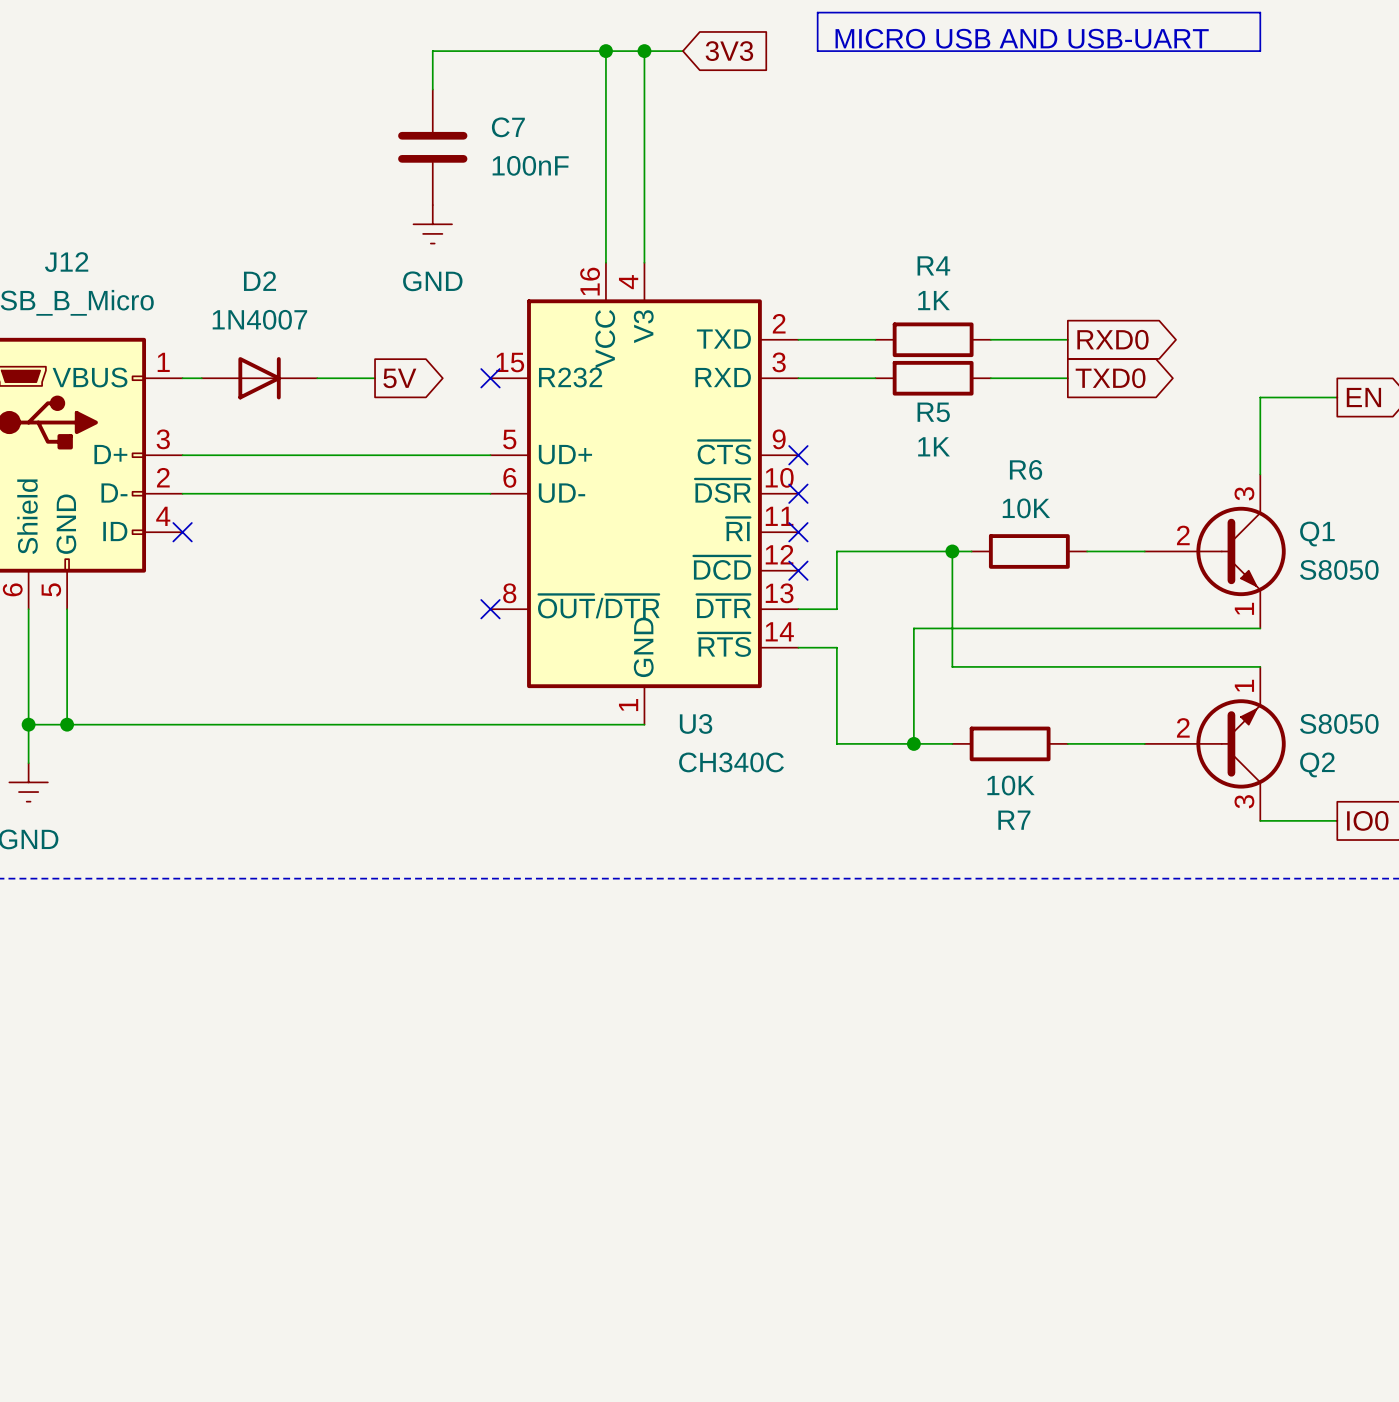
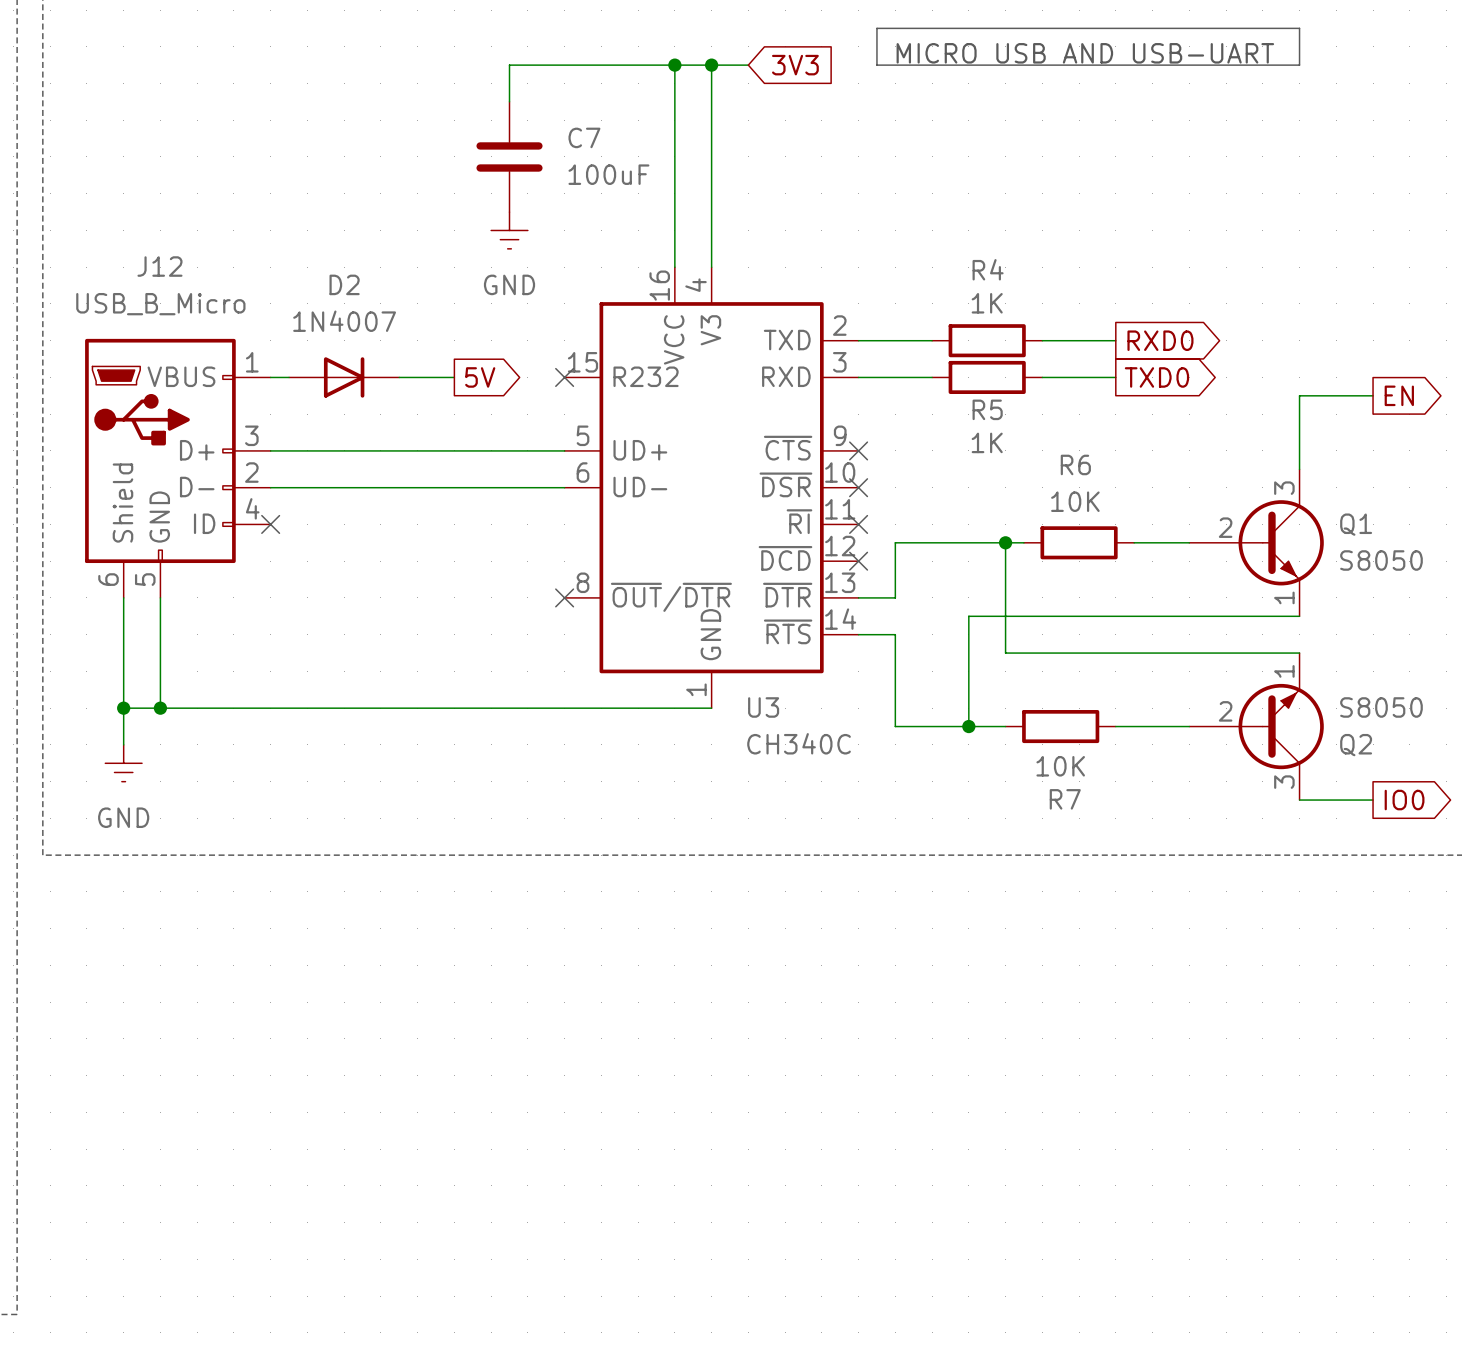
C7 value: 100nF (530, 165) -> 100uF (608, 174)

